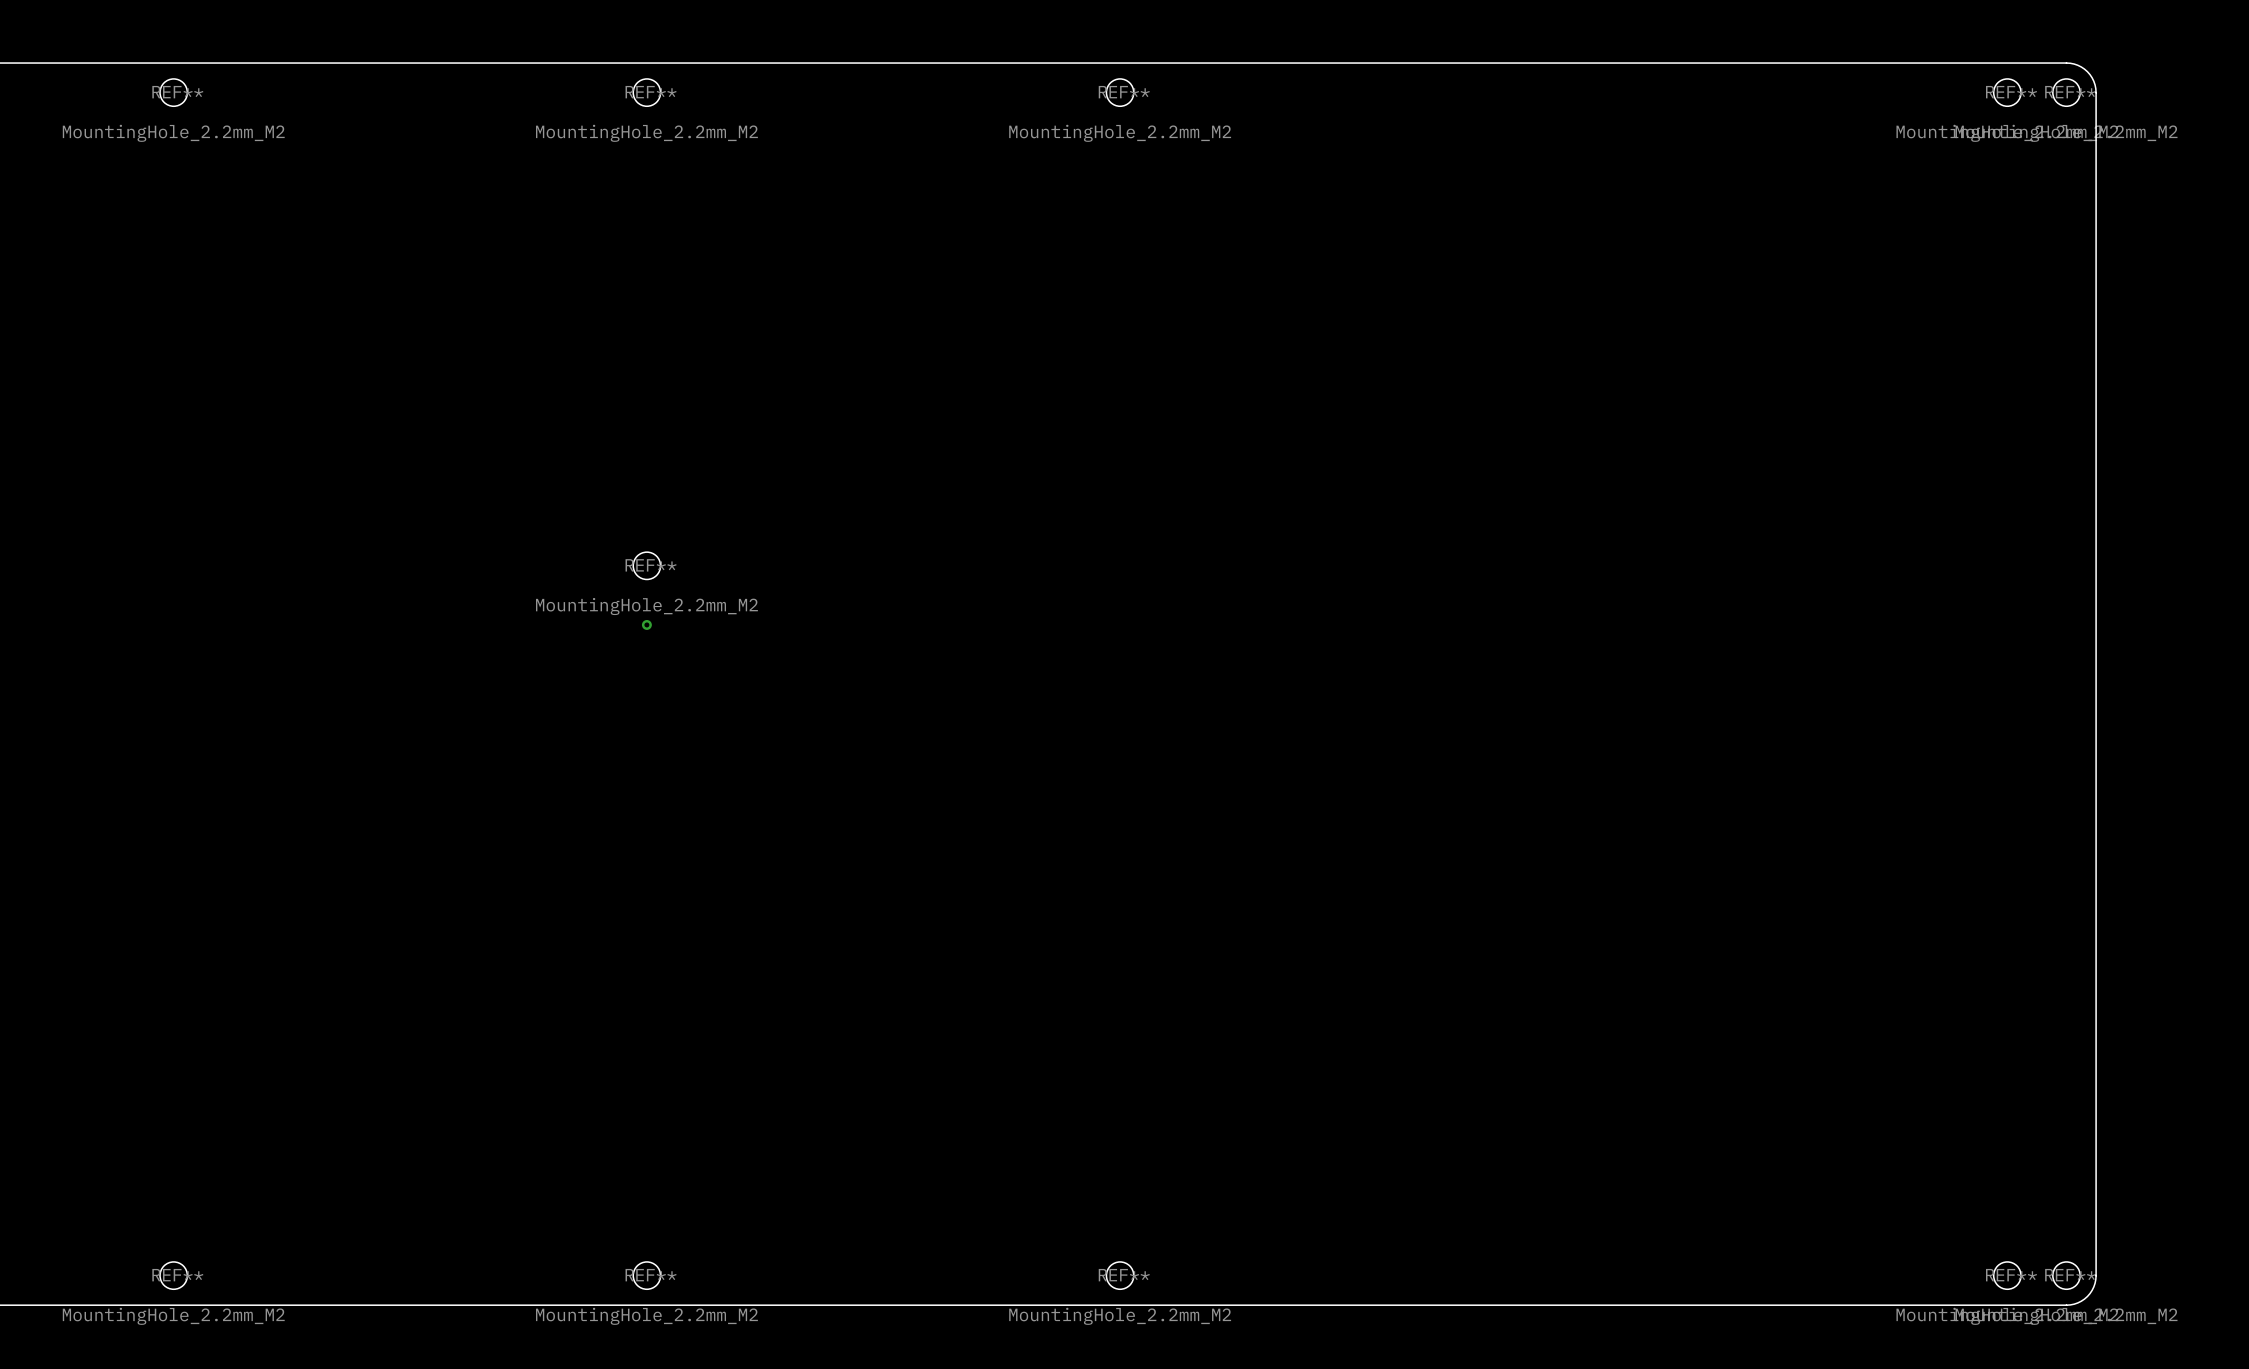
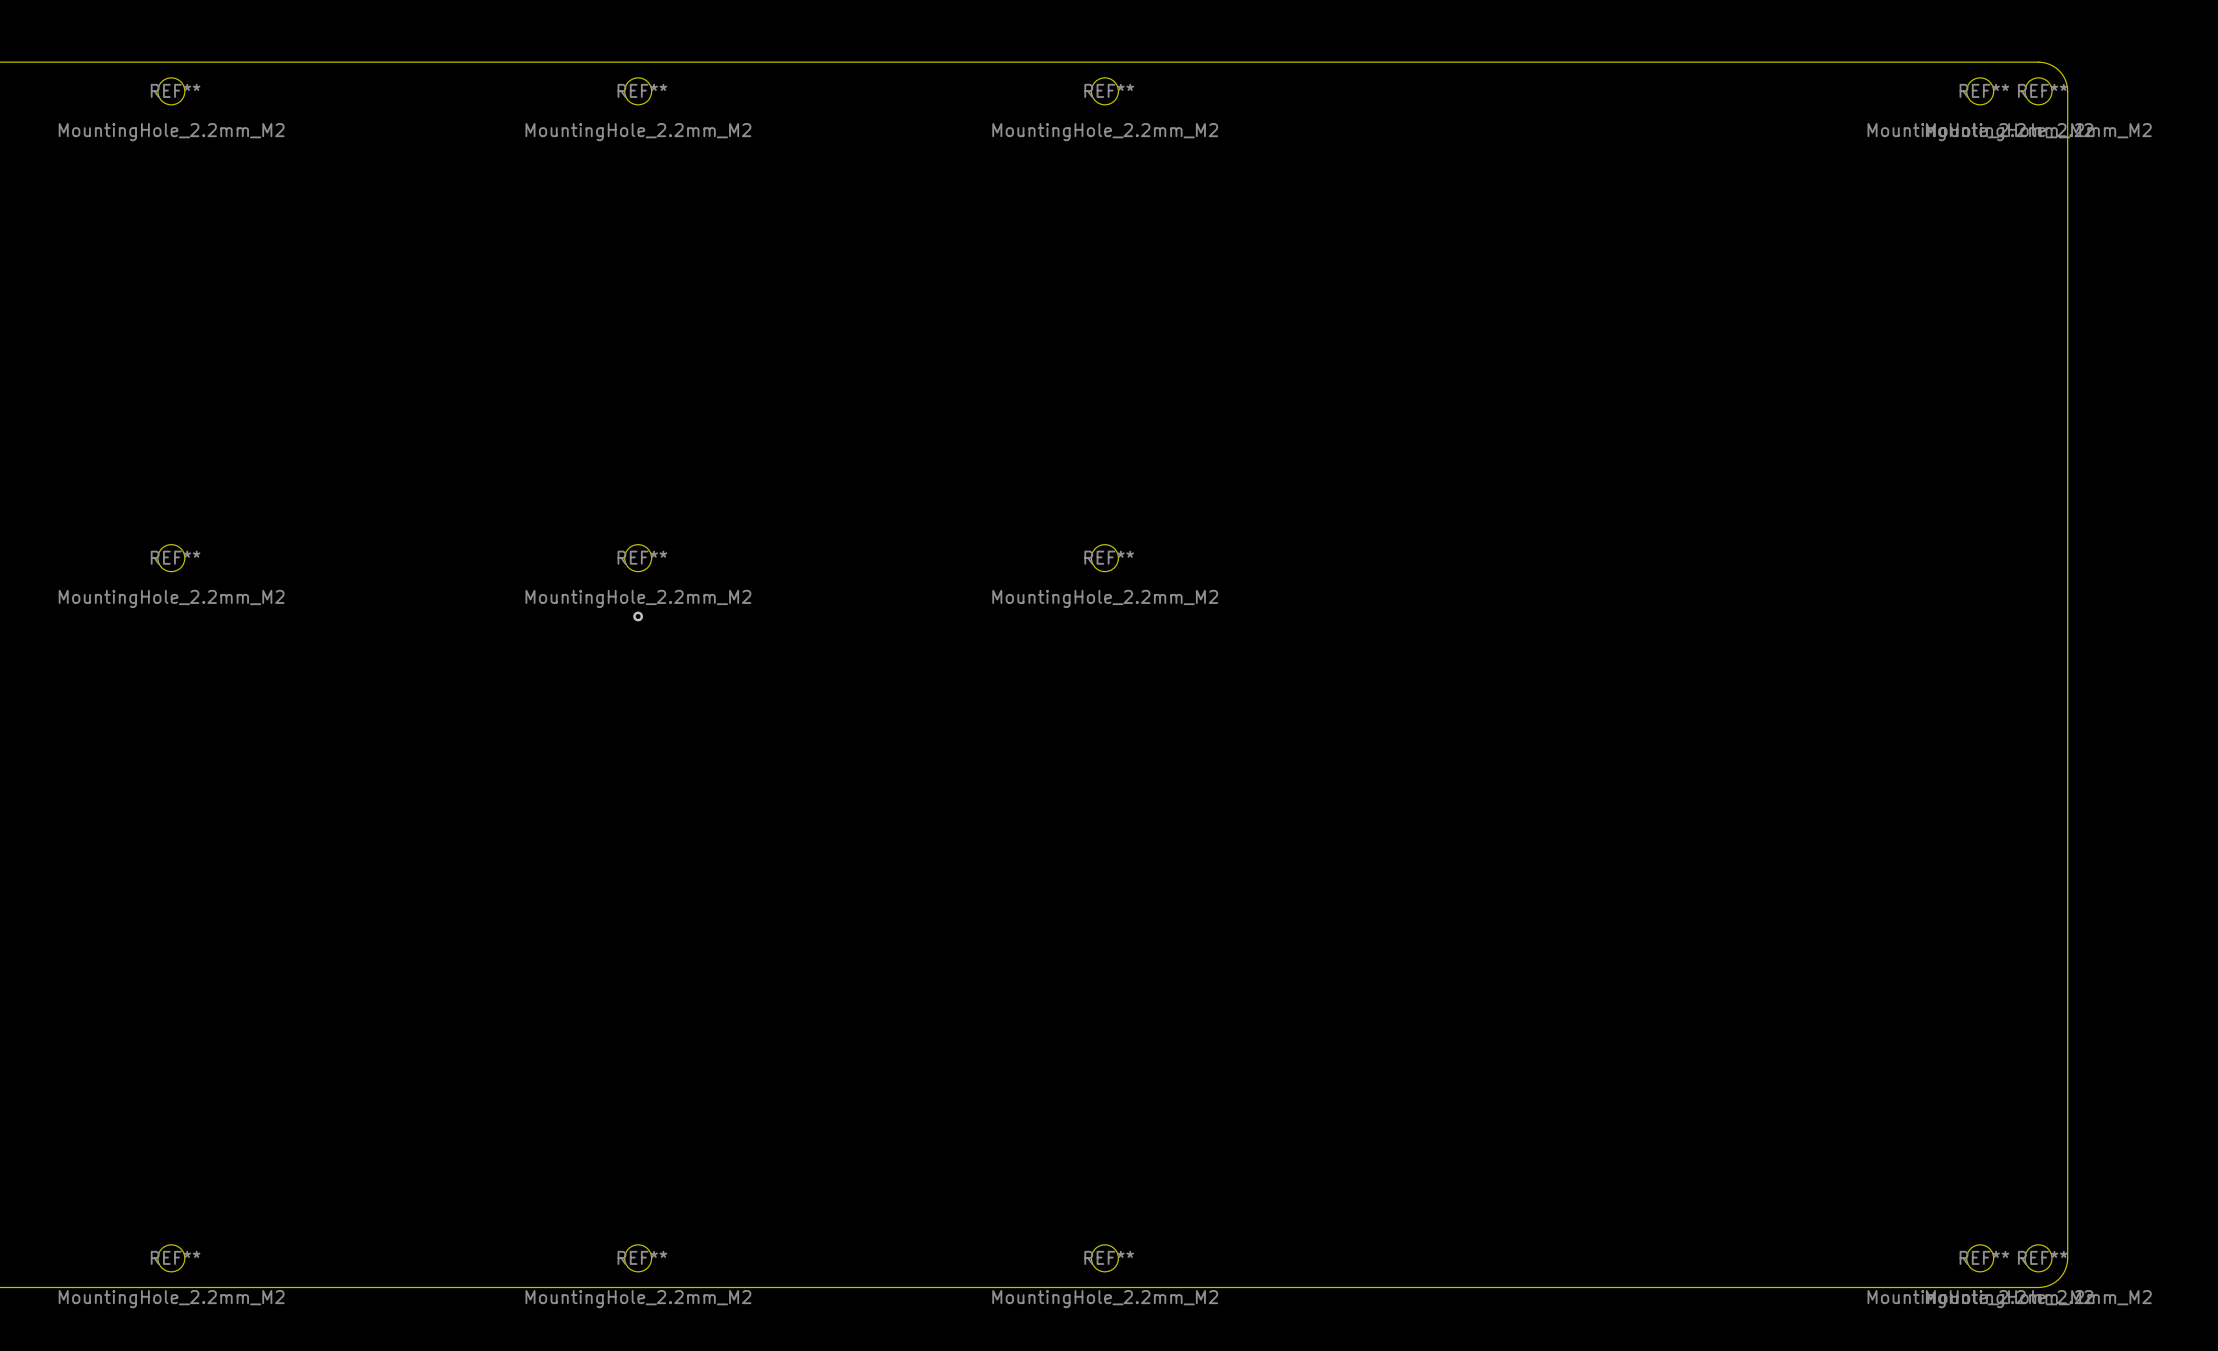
REF**: none -> MountingHole_2.2mm_M2 (171, 558)
REF**: none -> MountingHole_2.2mm_M2 (1104, 558)

